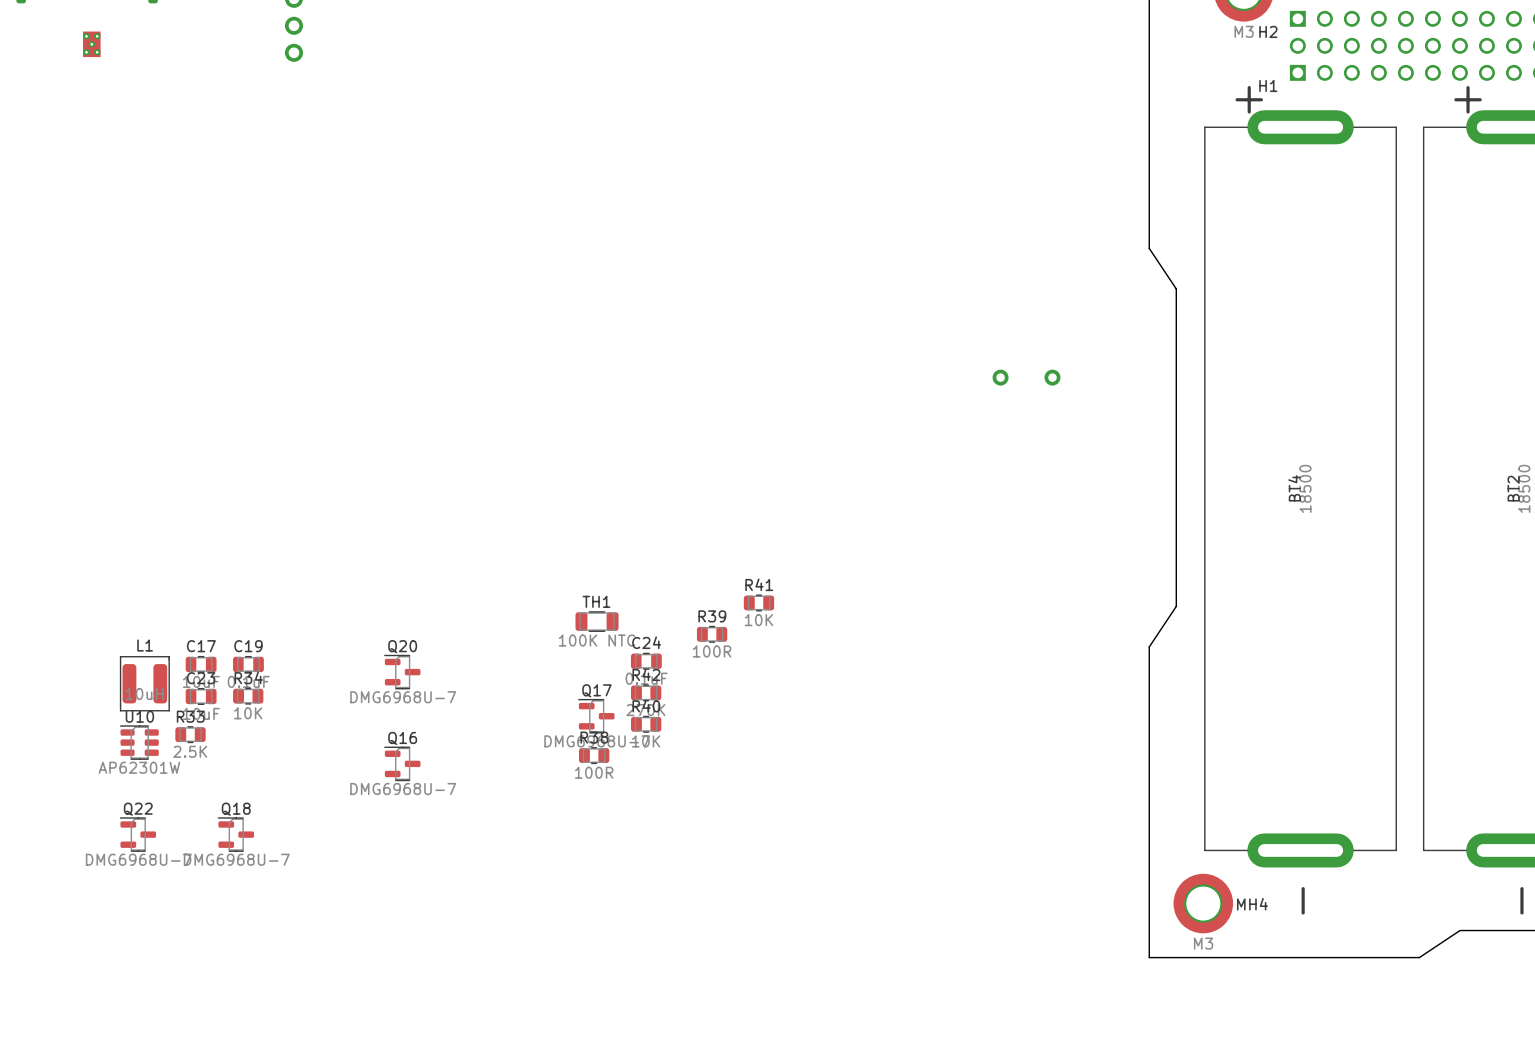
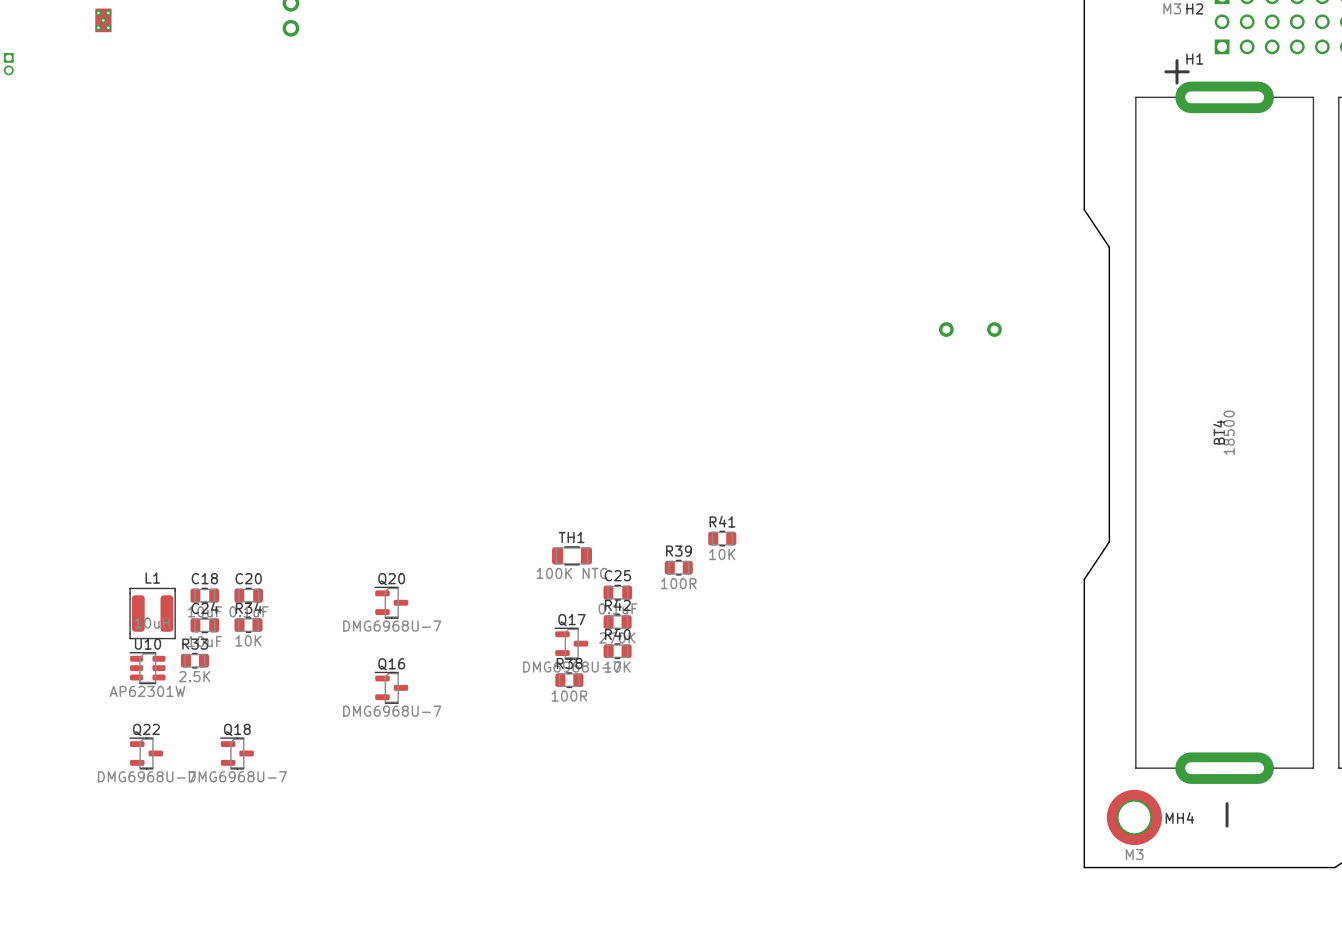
C24 name: C24 (646, 642) -> C25 (617, 575)
C17 name: C17 (201, 646) -> C18 (204, 578)
C19 name: C19 (248, 646) -> C20 (248, 578)
C23 name: C23 (201, 678) -> C24 (205, 608)

